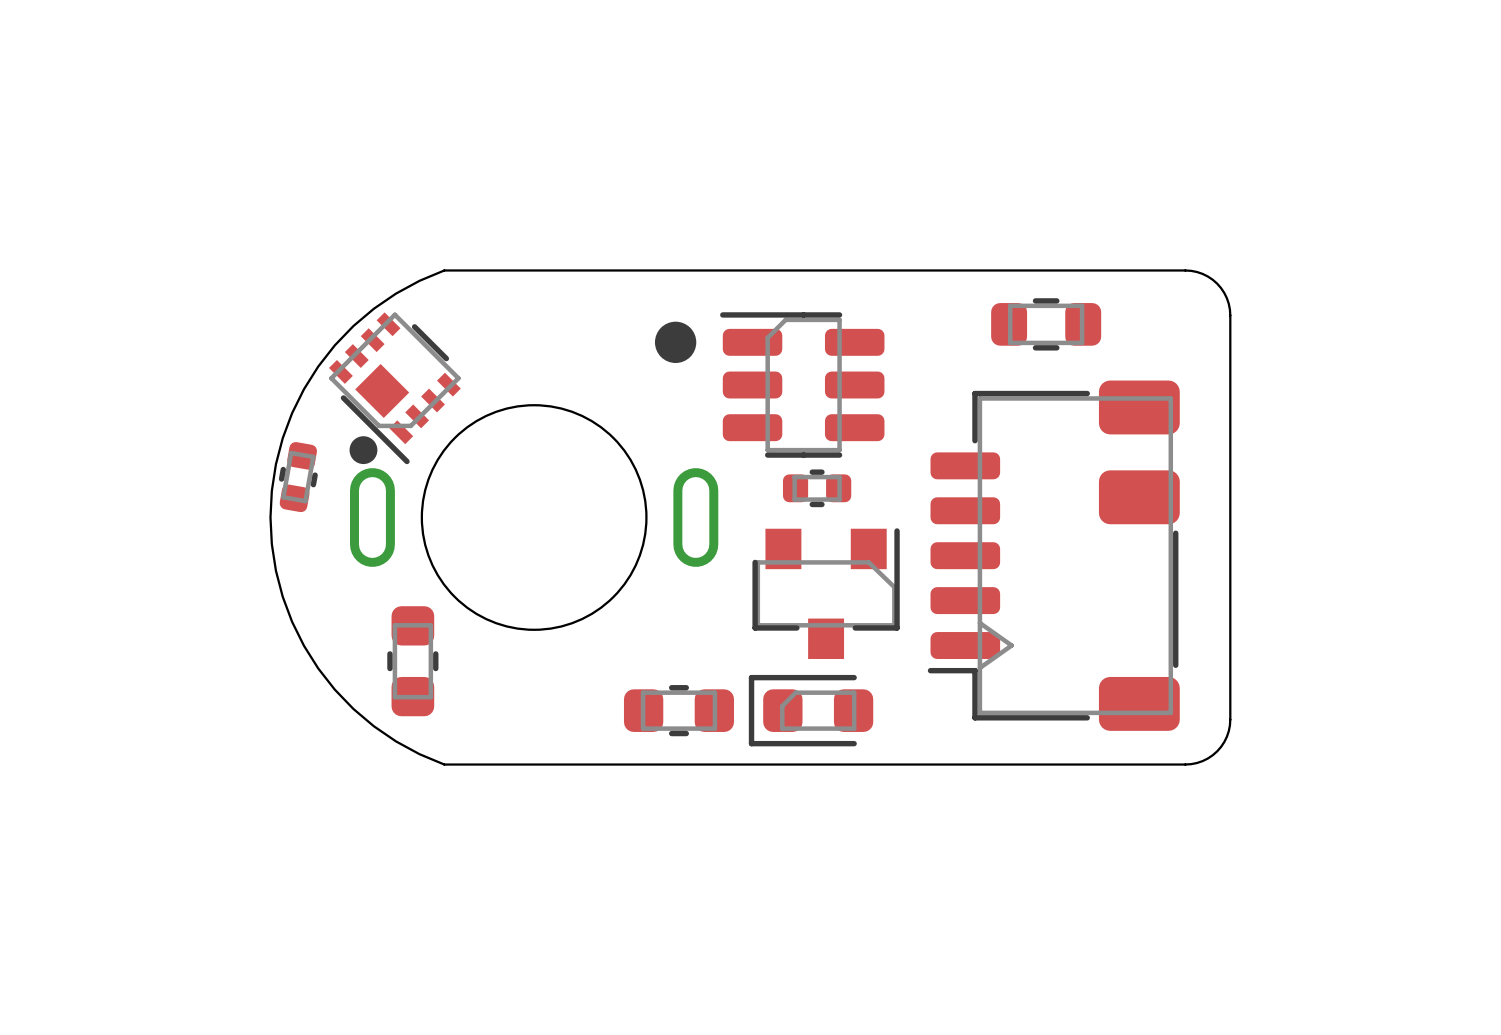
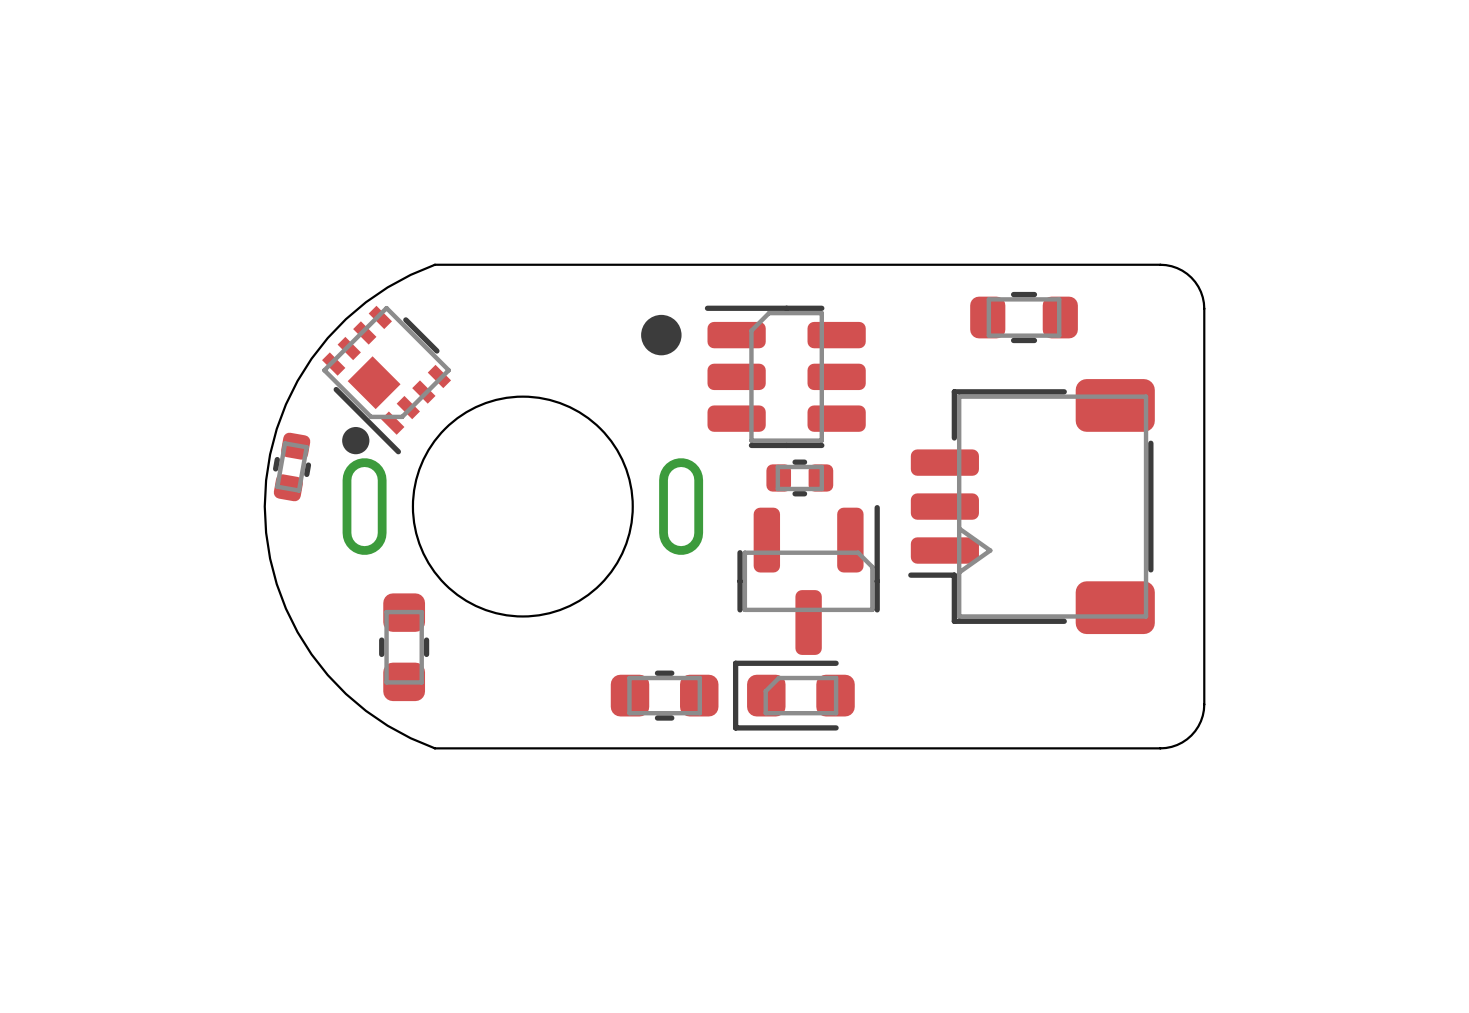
part footprint: [927, 380, 1180, 731] -> [908, 379, 1155, 635]
part footprint: [752, 528, 900, 659] -> [737, 505, 880, 655]

